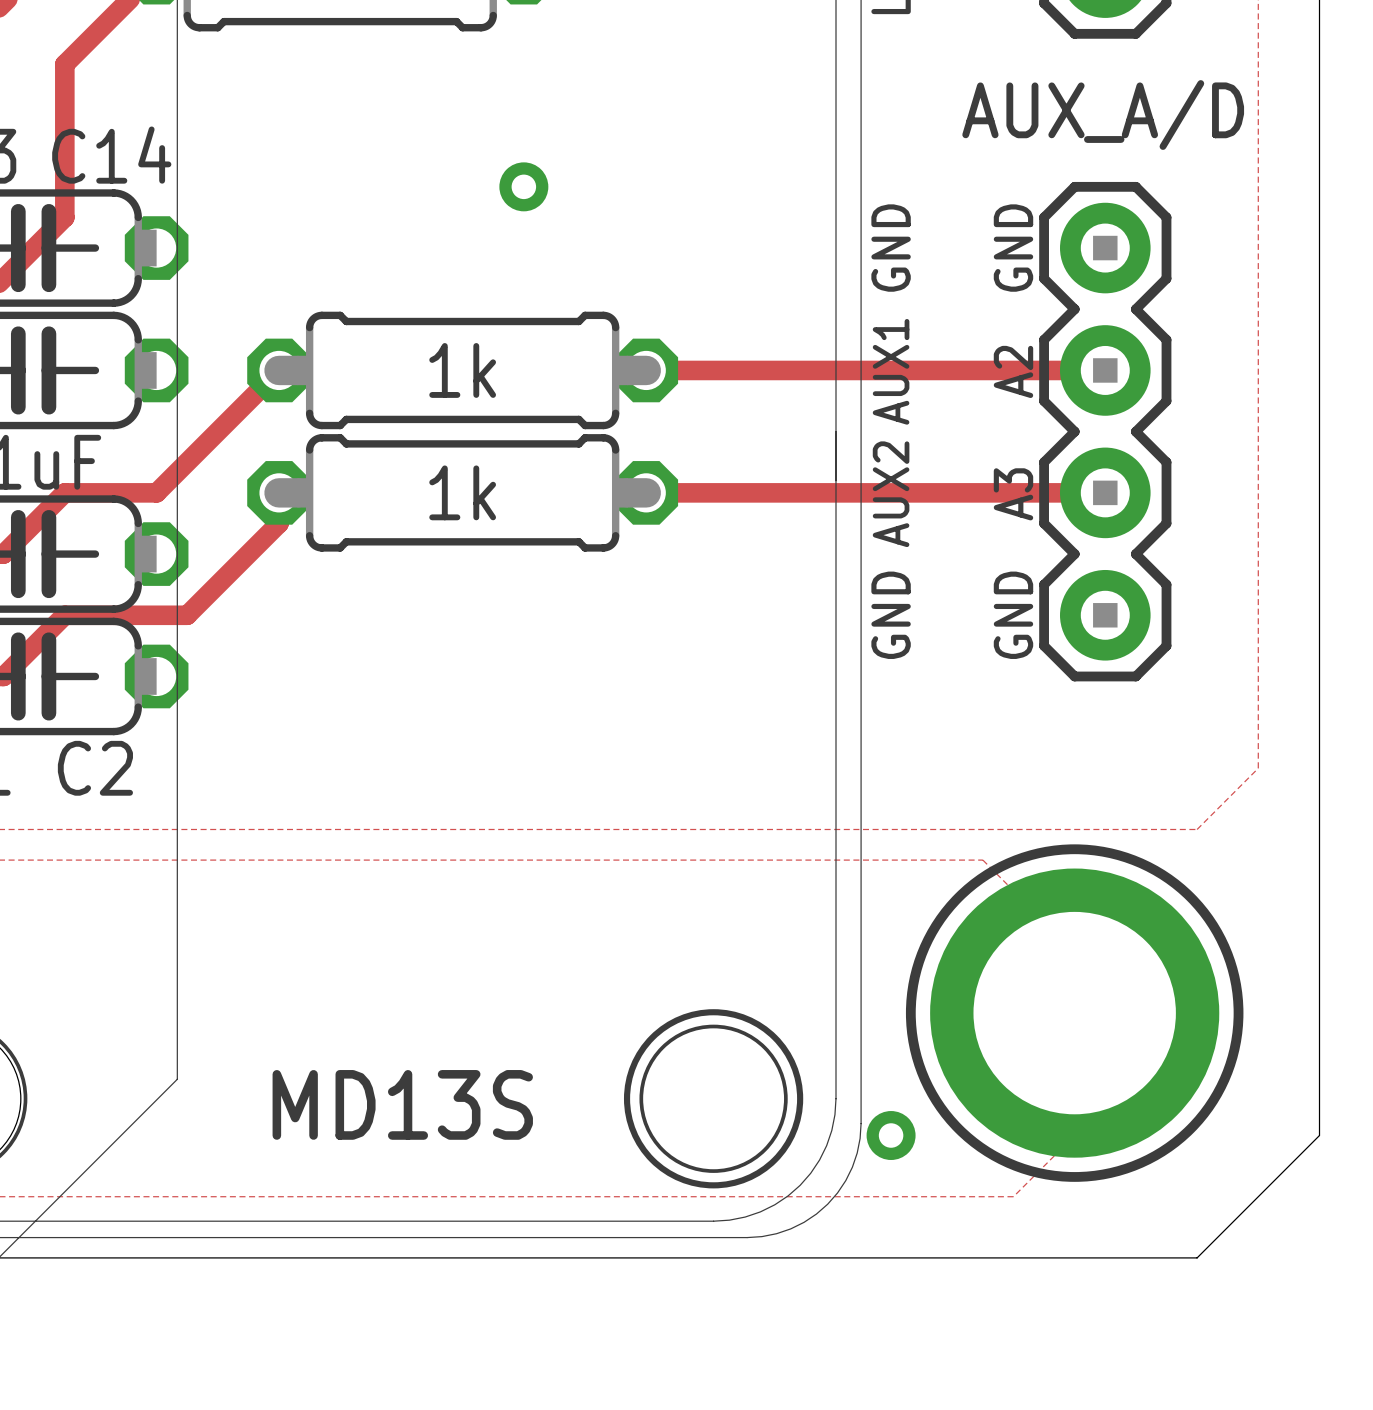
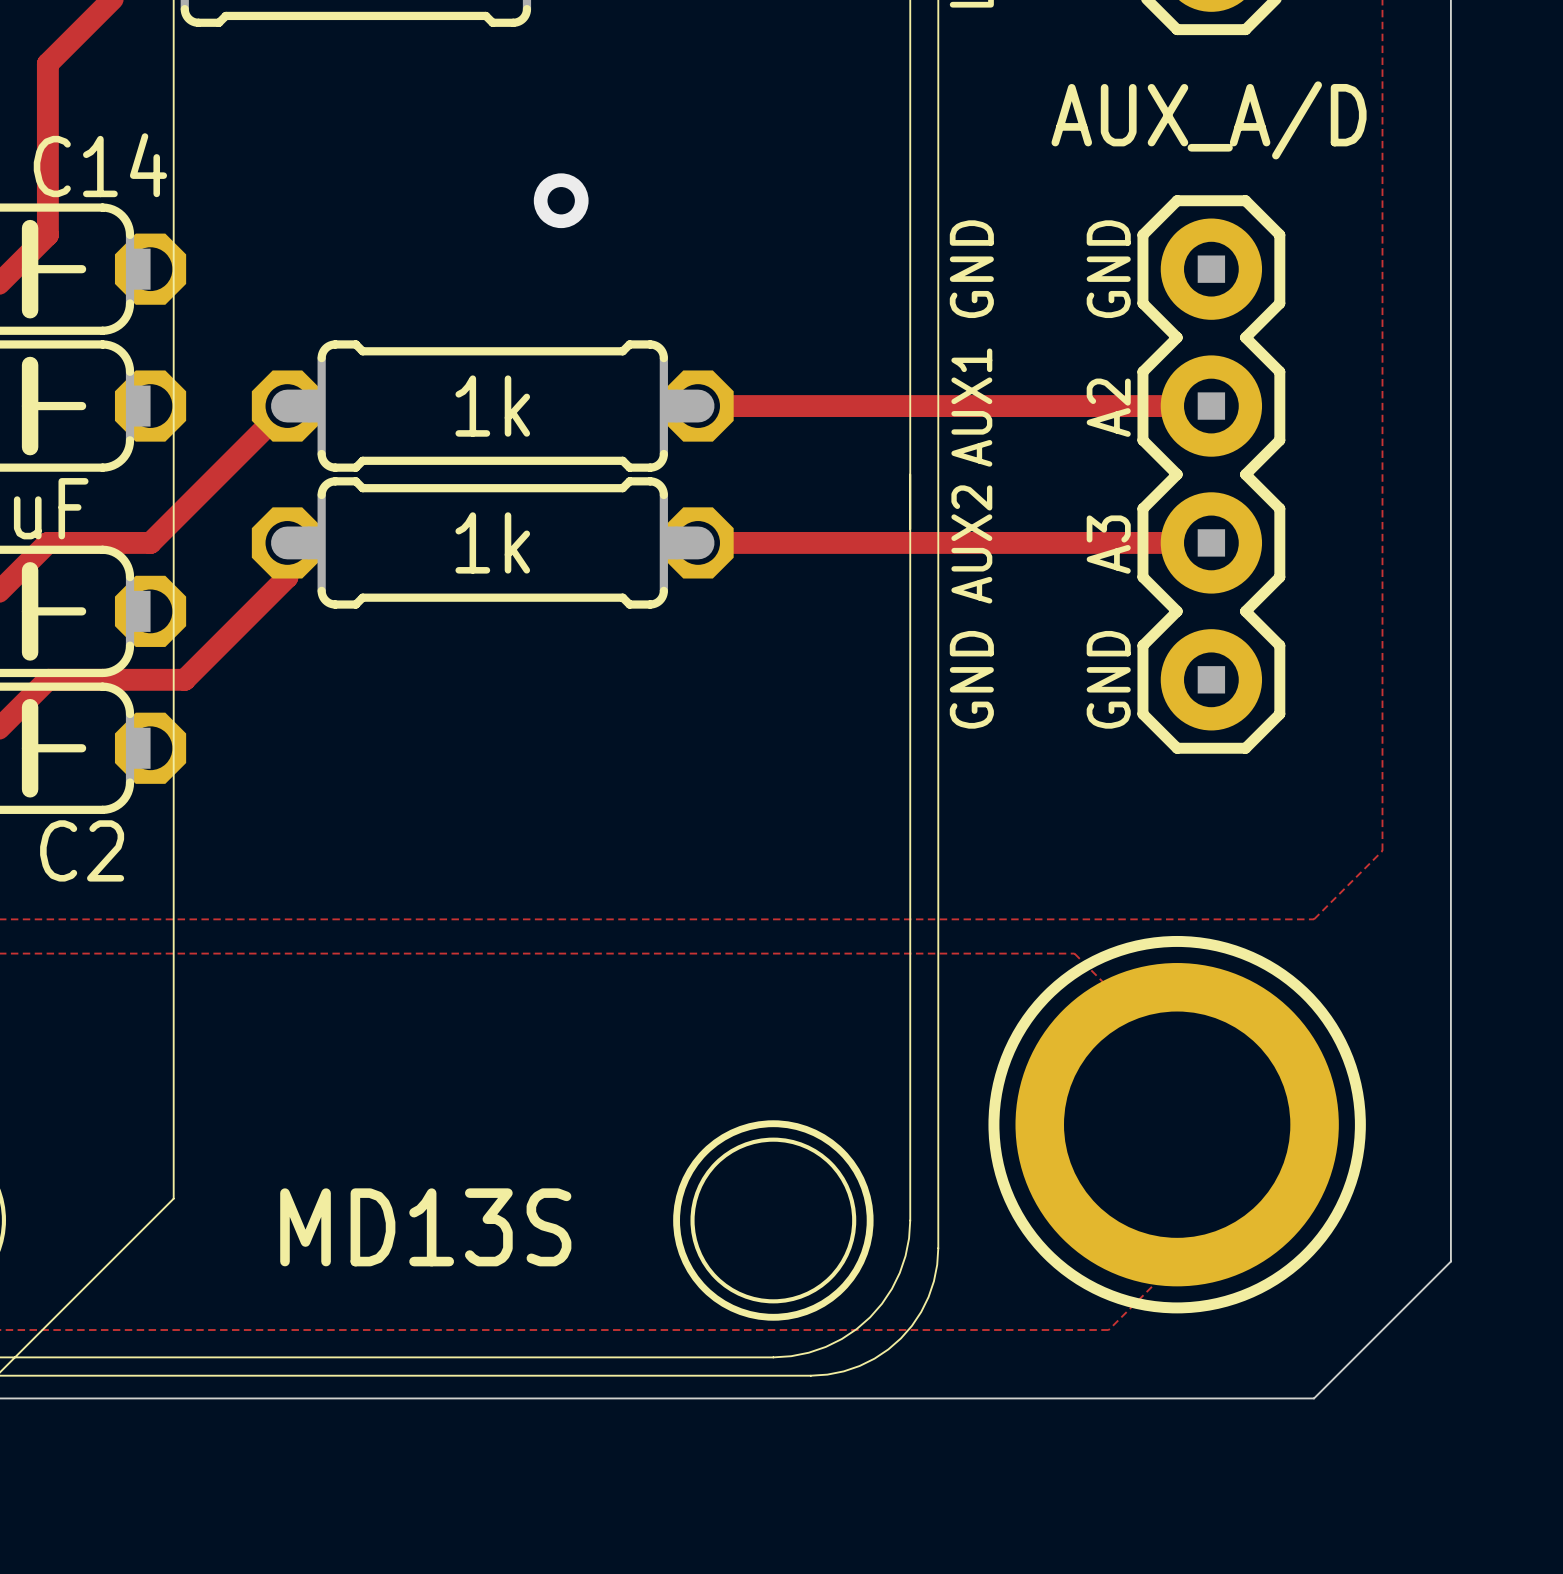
via: (891, 1135) -> none

